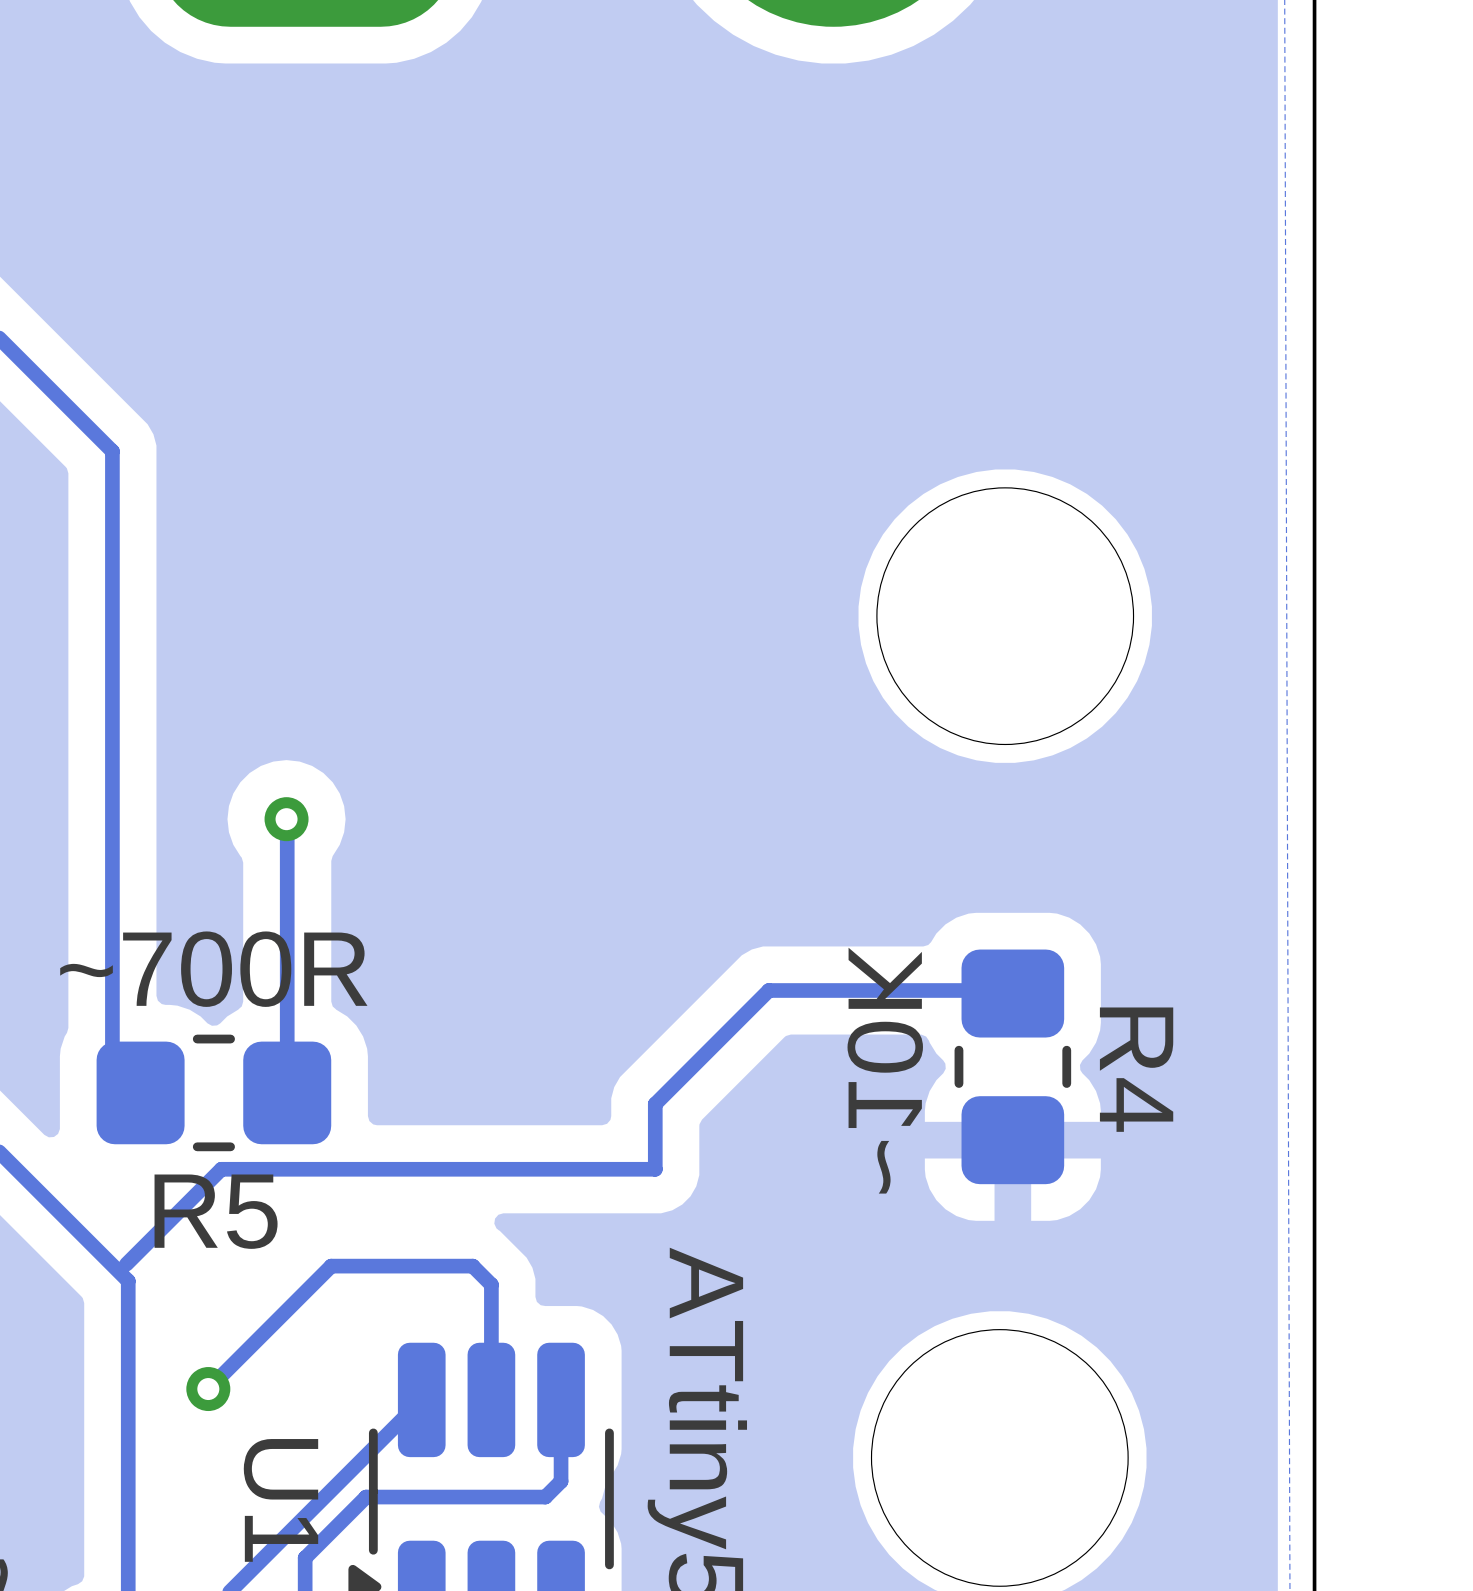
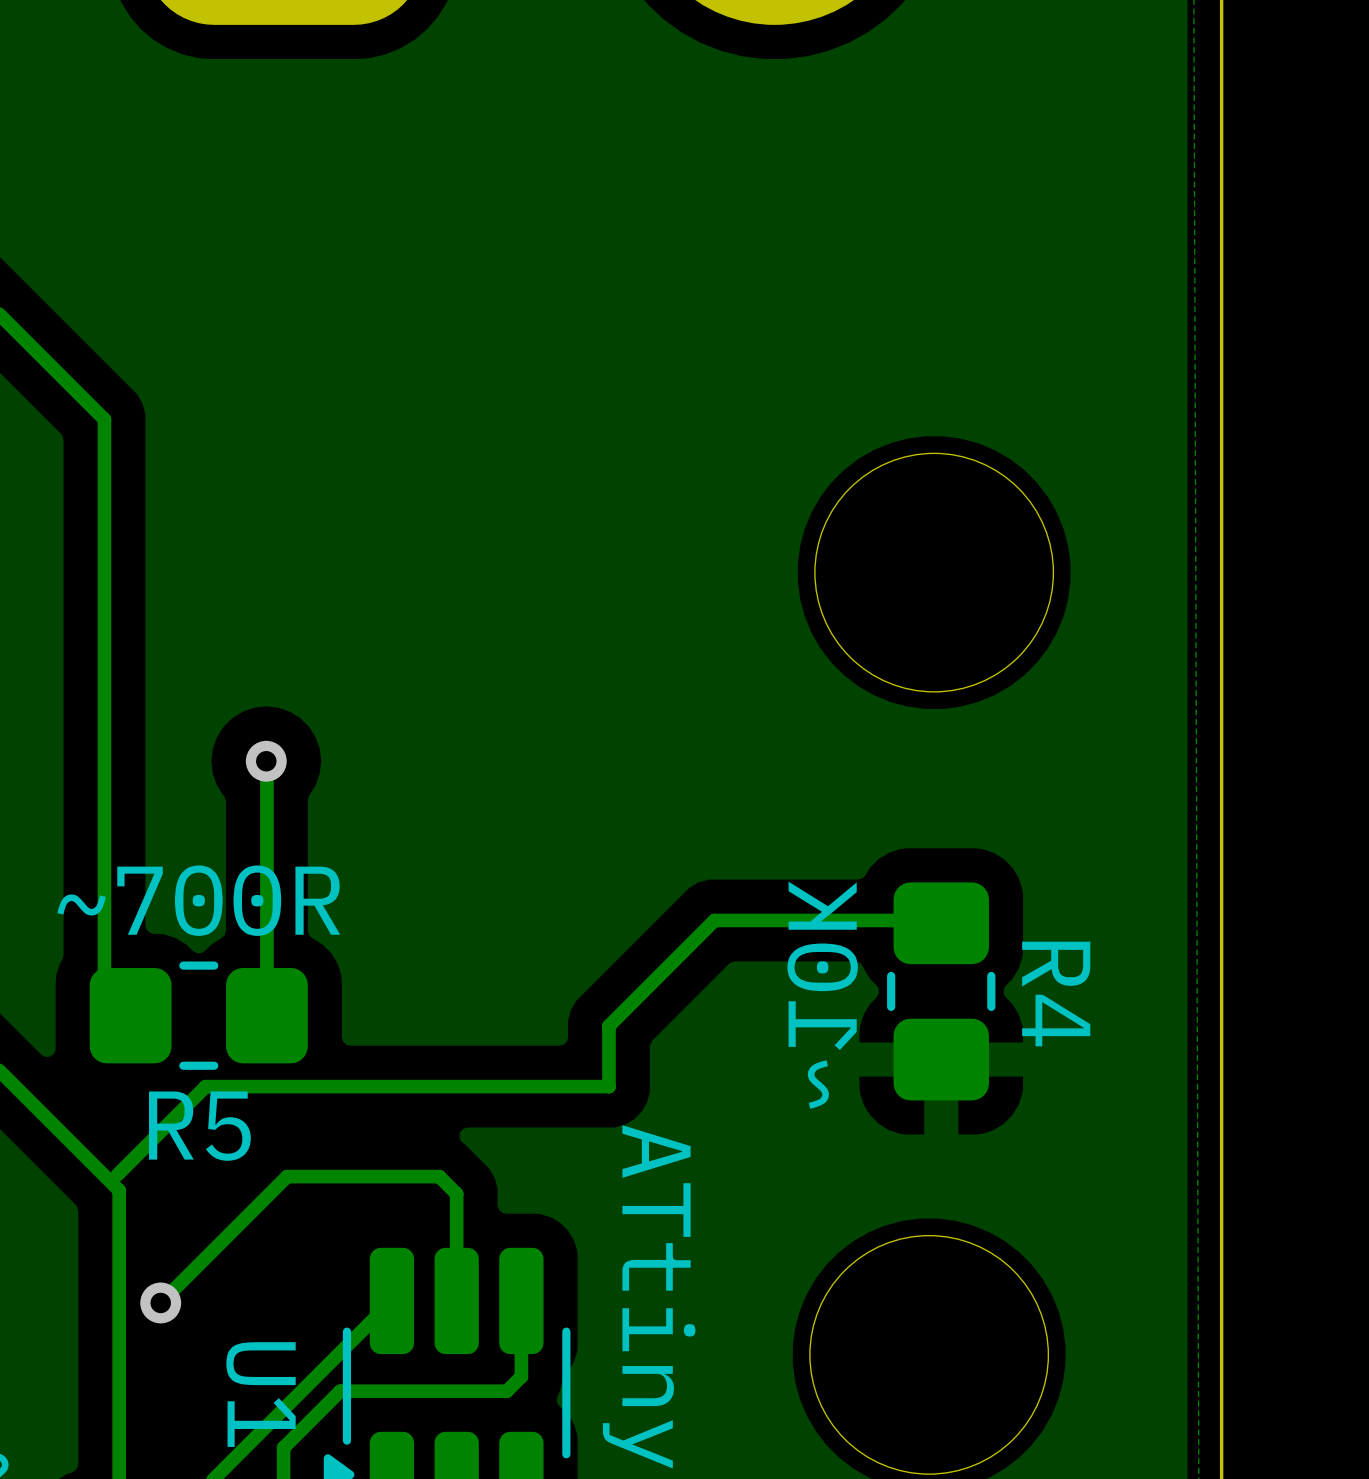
track: (331, 1266) (208, 1389) -> (307, 1176) (287, 1176) (160, 1302)
via position: (208, 1389) -> (160, 1302)

